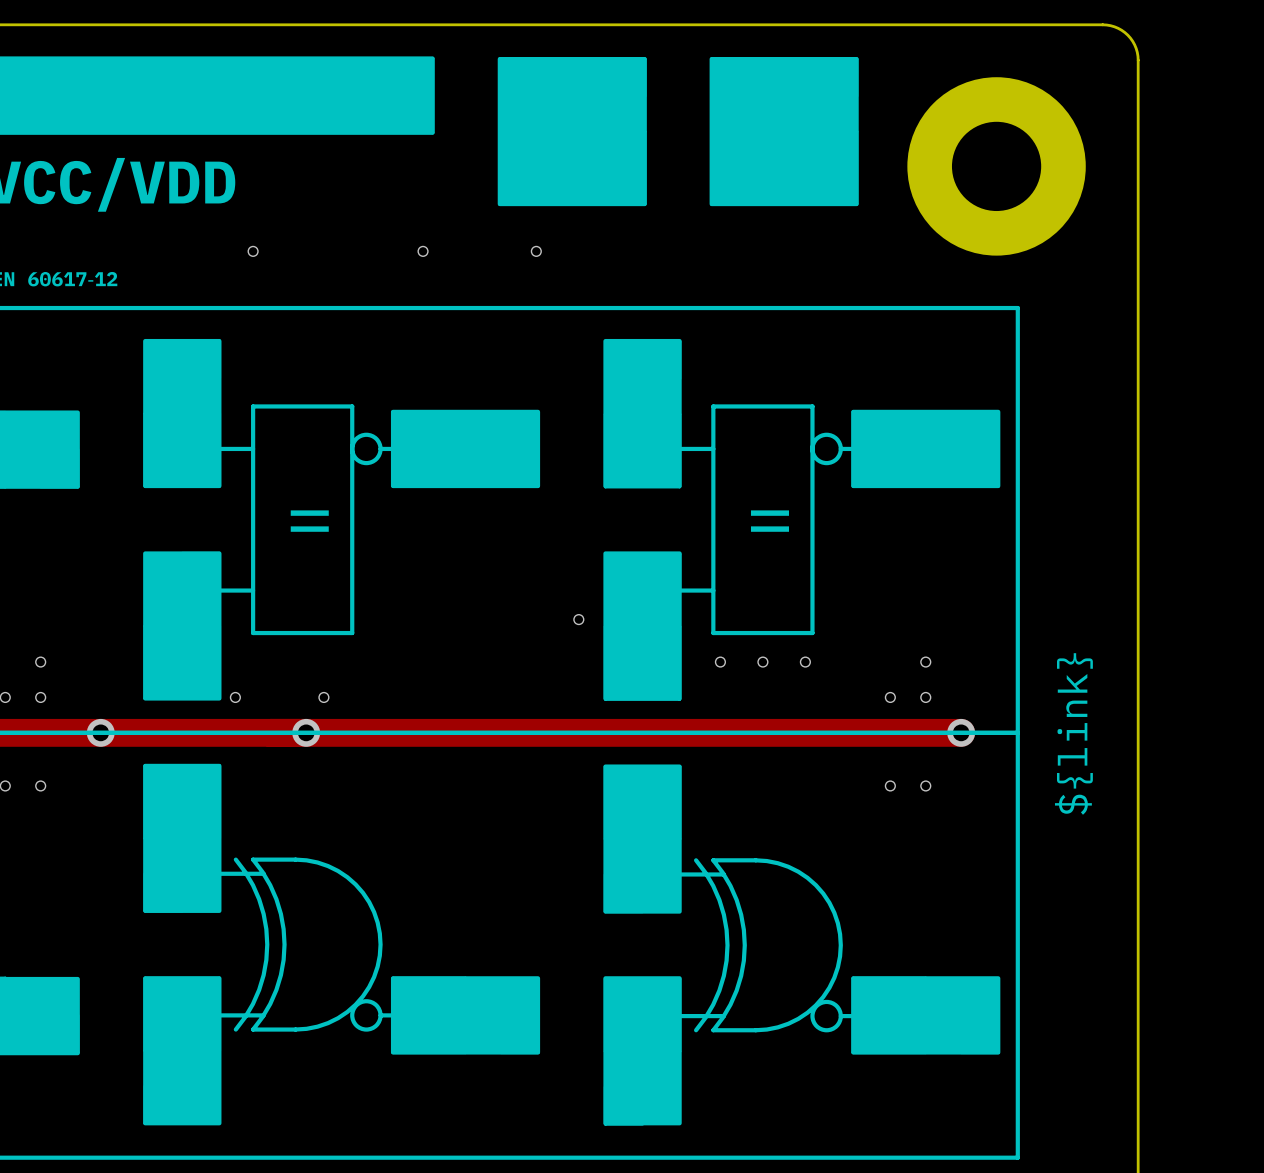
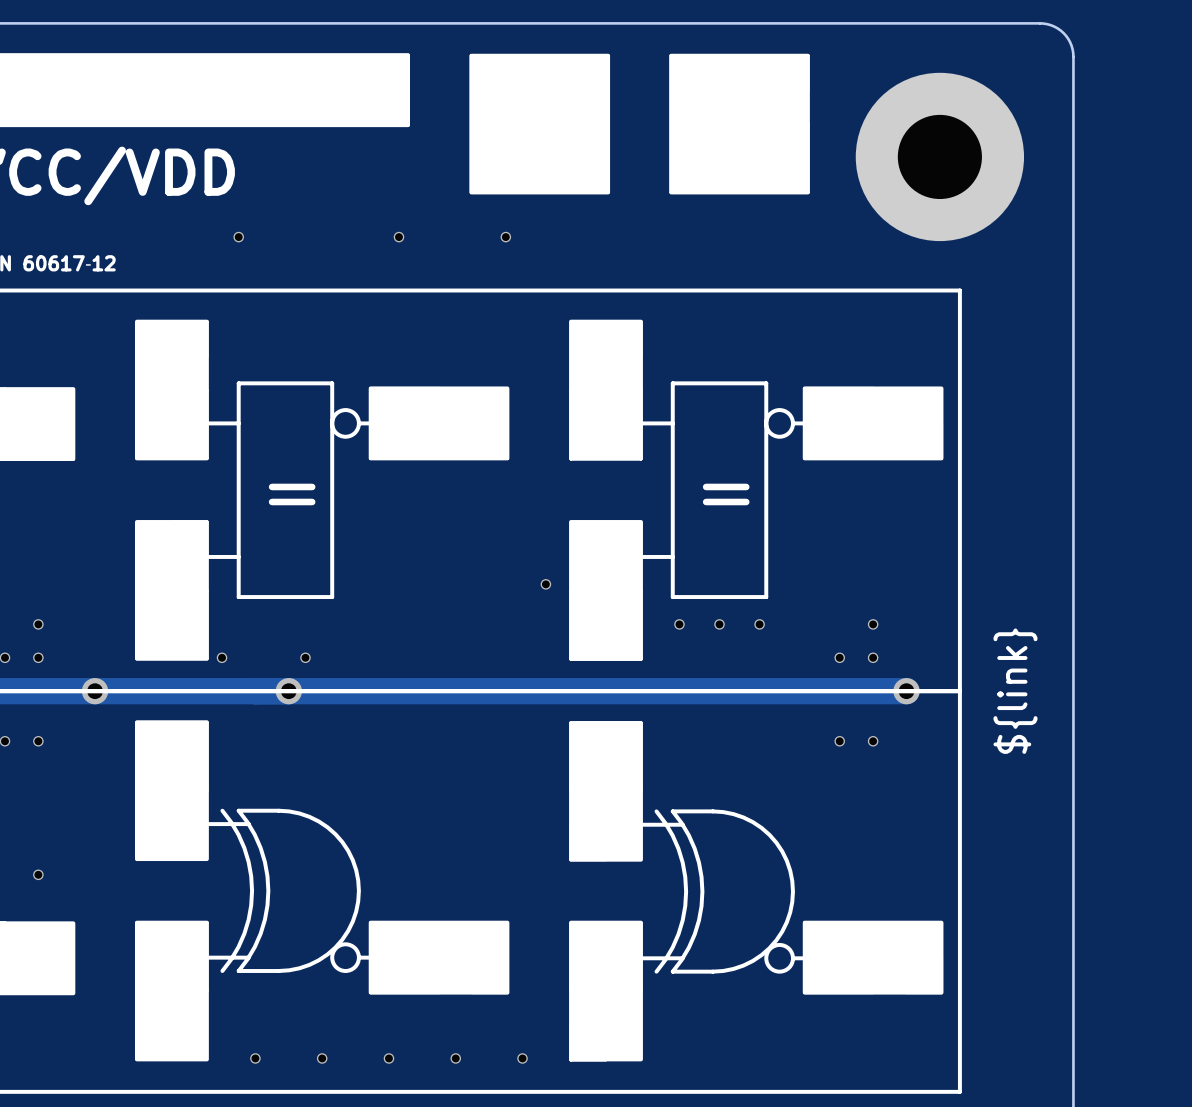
via: none -> (38, 874)
via: none -> (255, 1058)
via: none -> (322, 1058)
via: none -> (388, 1058)
via: none -> (455, 1058)
via: none -> (522, 1058)

